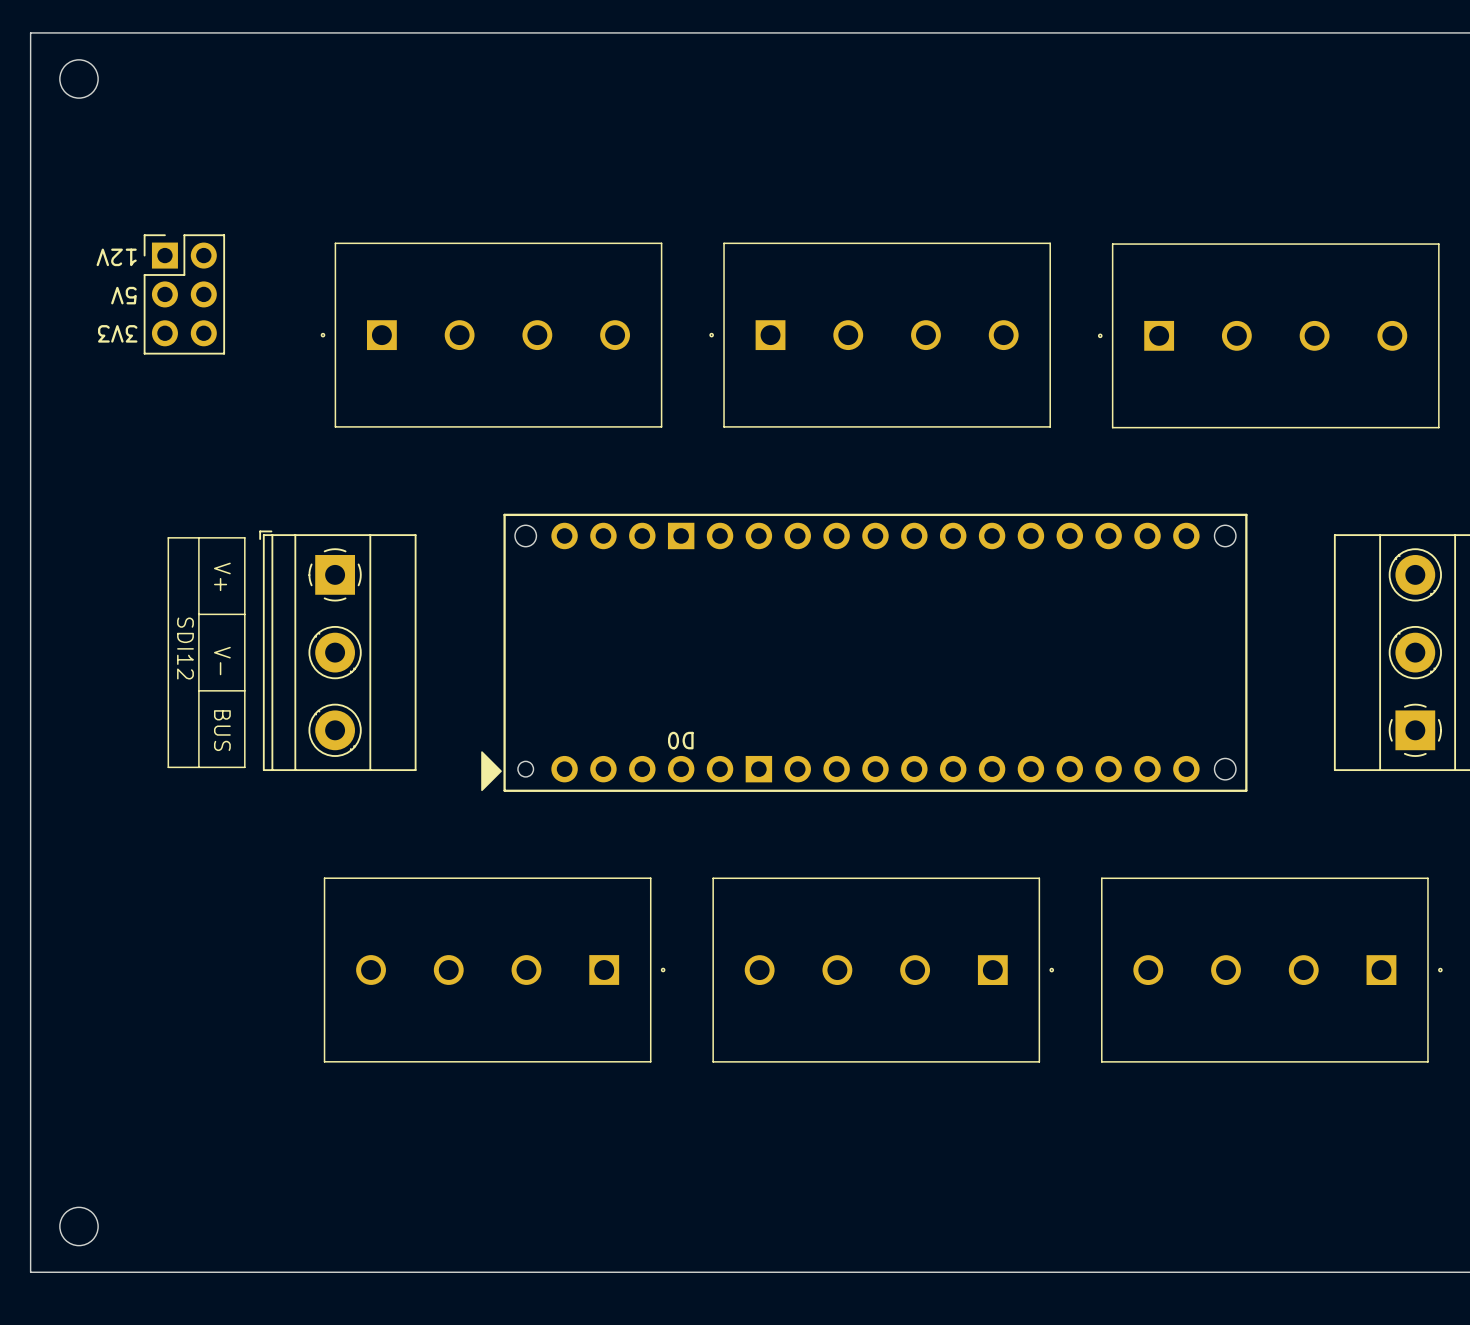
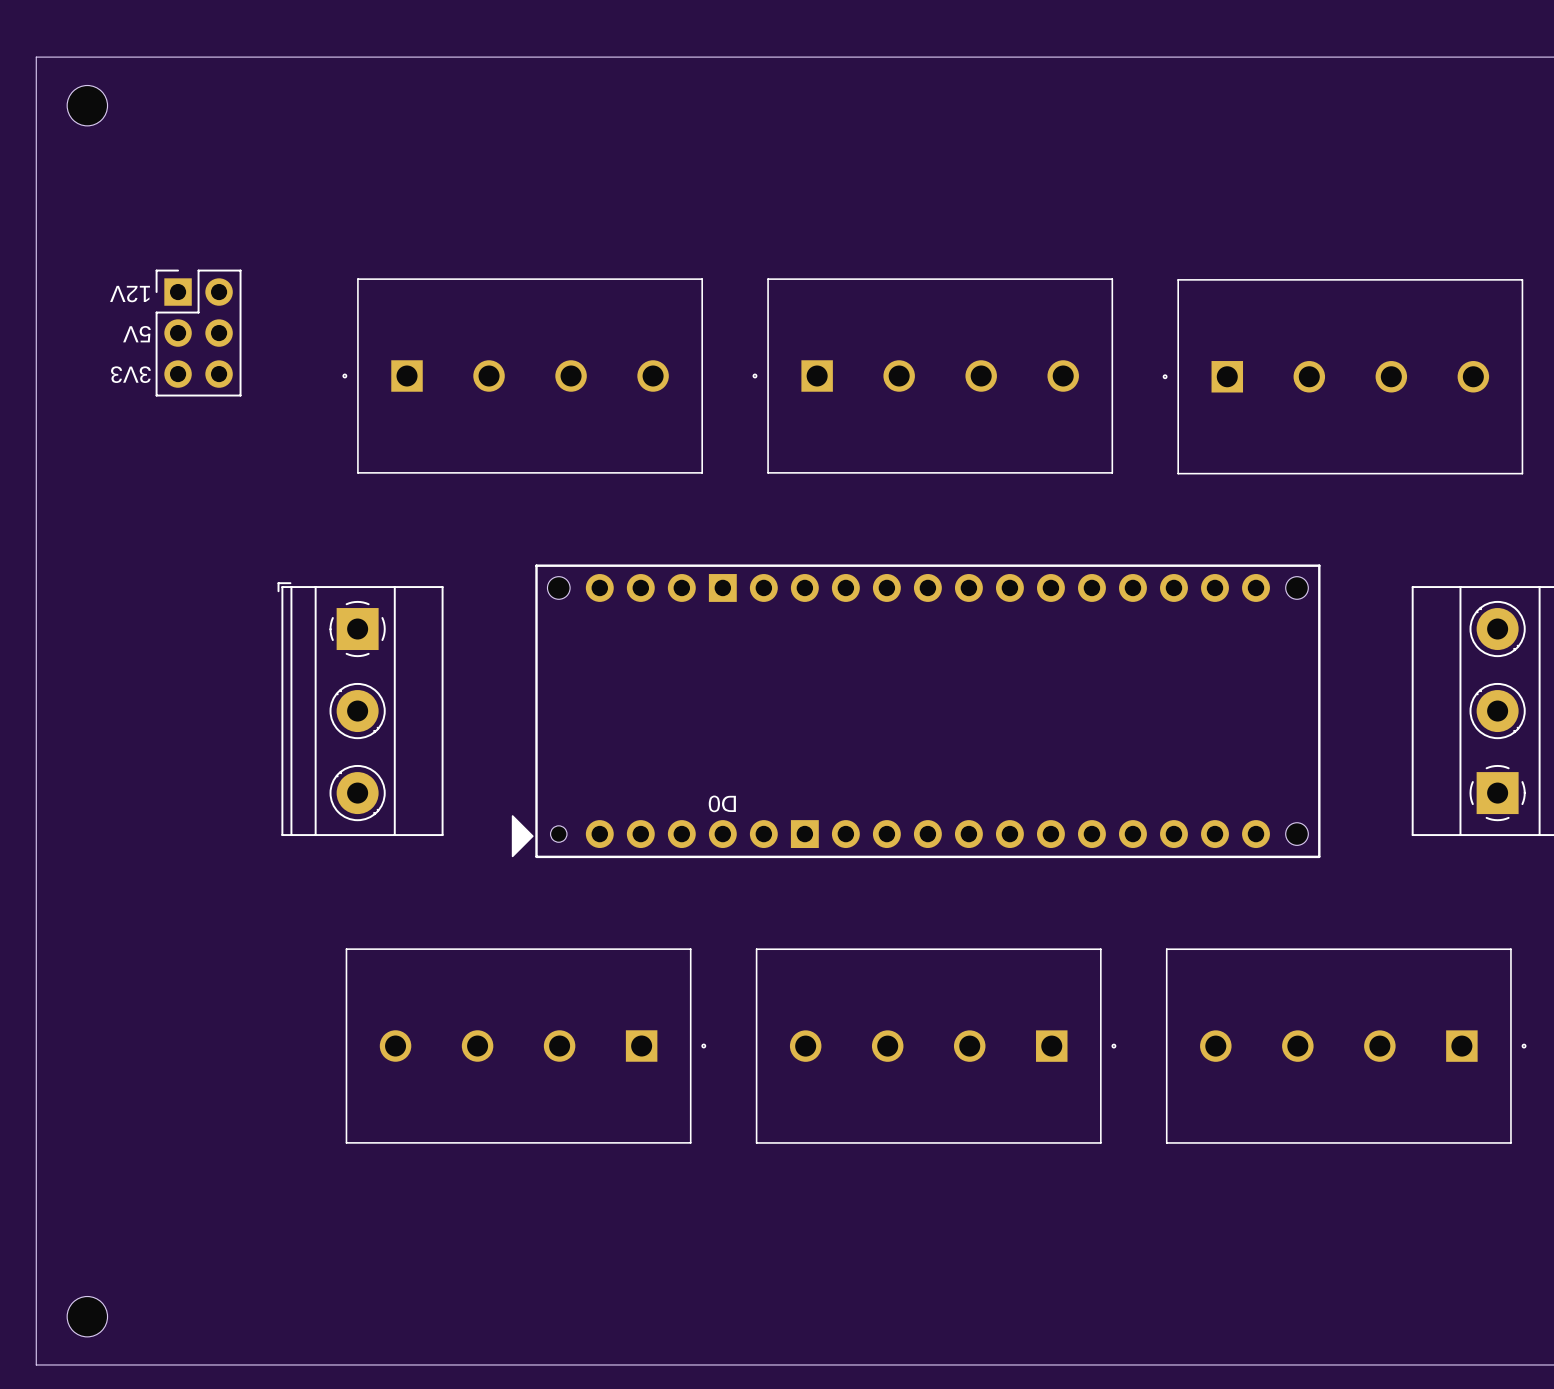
line: (168, 537) (244, 537) (244, 767) (168, 767) (168, 537) -> none
line: (198, 537) (198, 767) -> none
text: V+ (222, 576) -> none
line: (198, 614) (244, 614) -> none
text: SDI12 (185, 648) -> none
text: V- (222, 661) -> none
line: (198, 690) (244, 690) -> none
text: BUS (222, 730) -> none

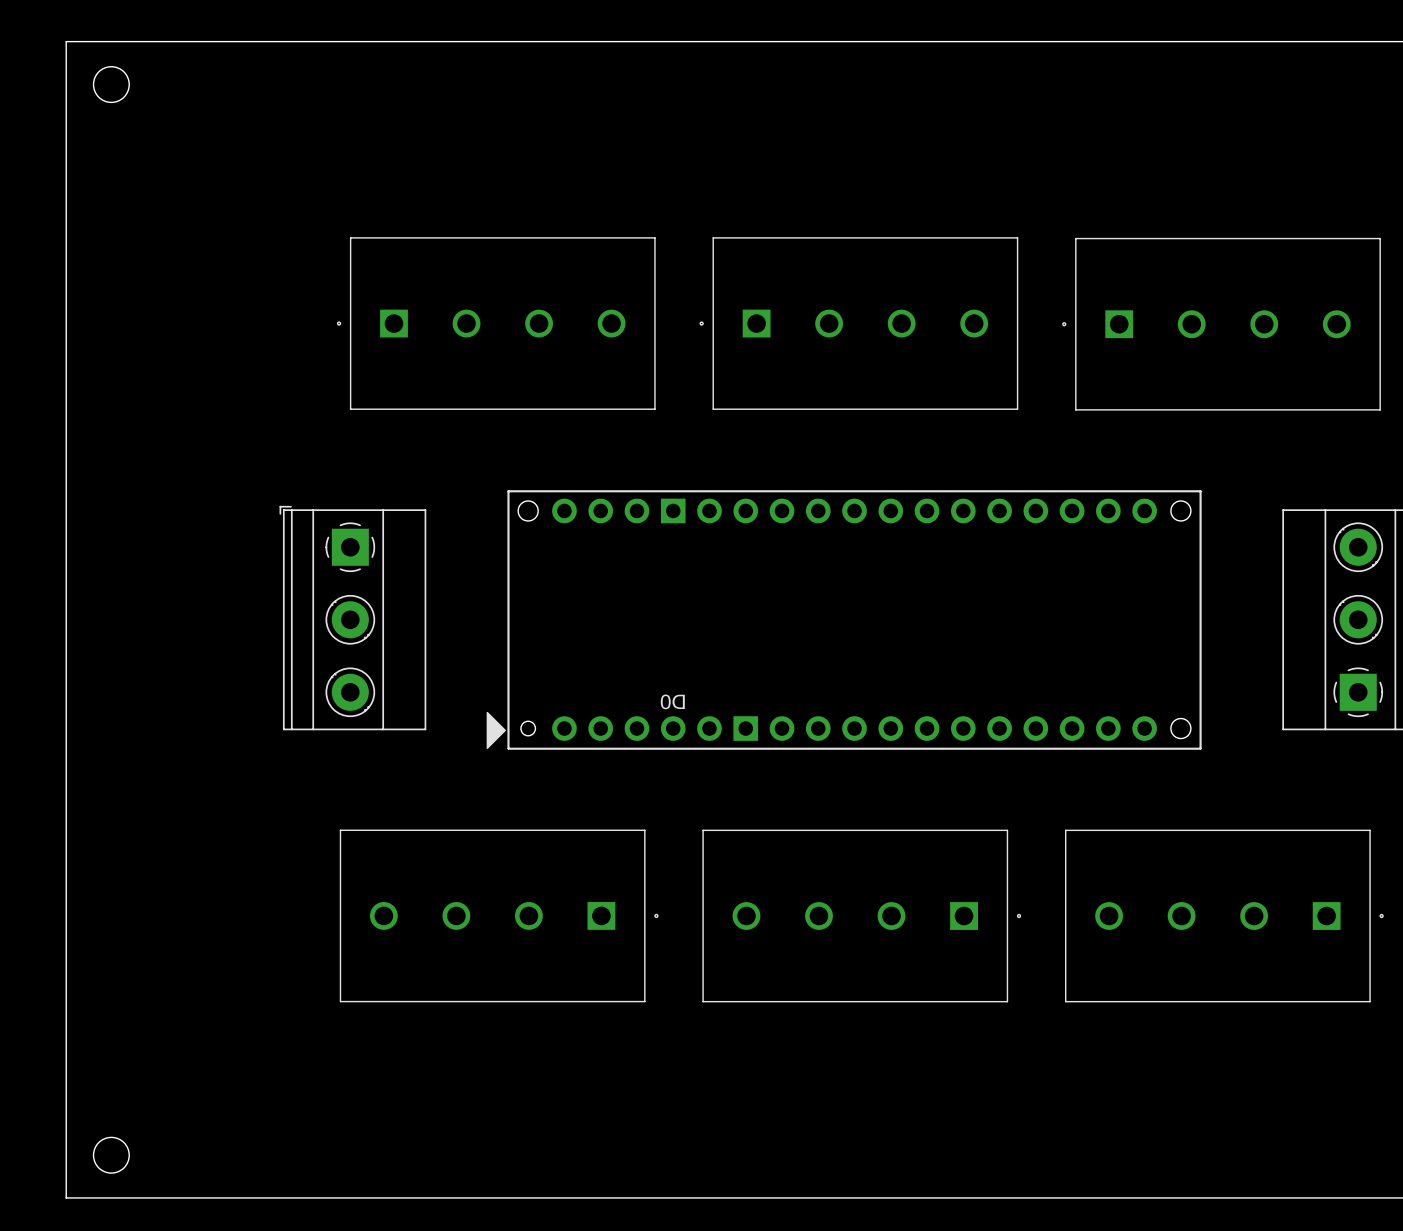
text: 12V (130, 294) -> none
part: (198, 333) -> none
text: 5V (136, 334) -> none
text: 3V3 (130, 374) -> none

